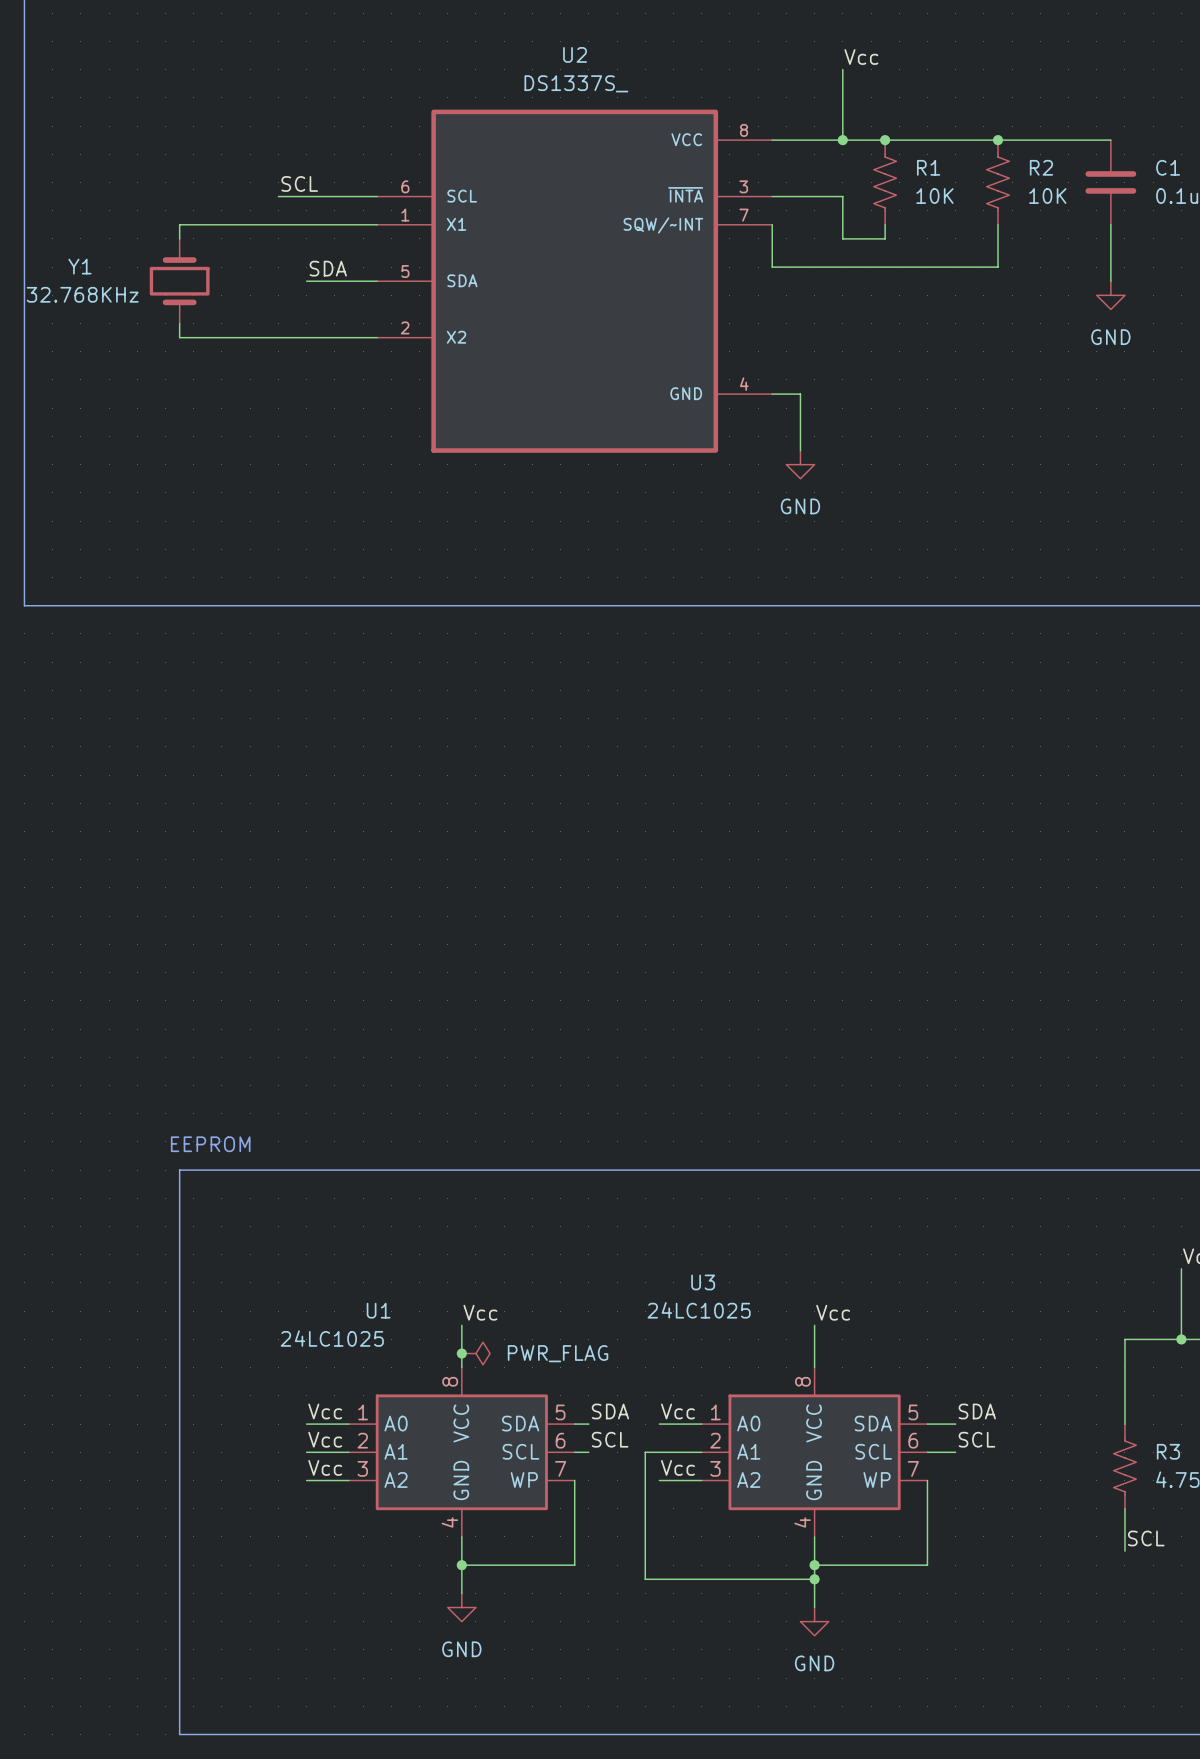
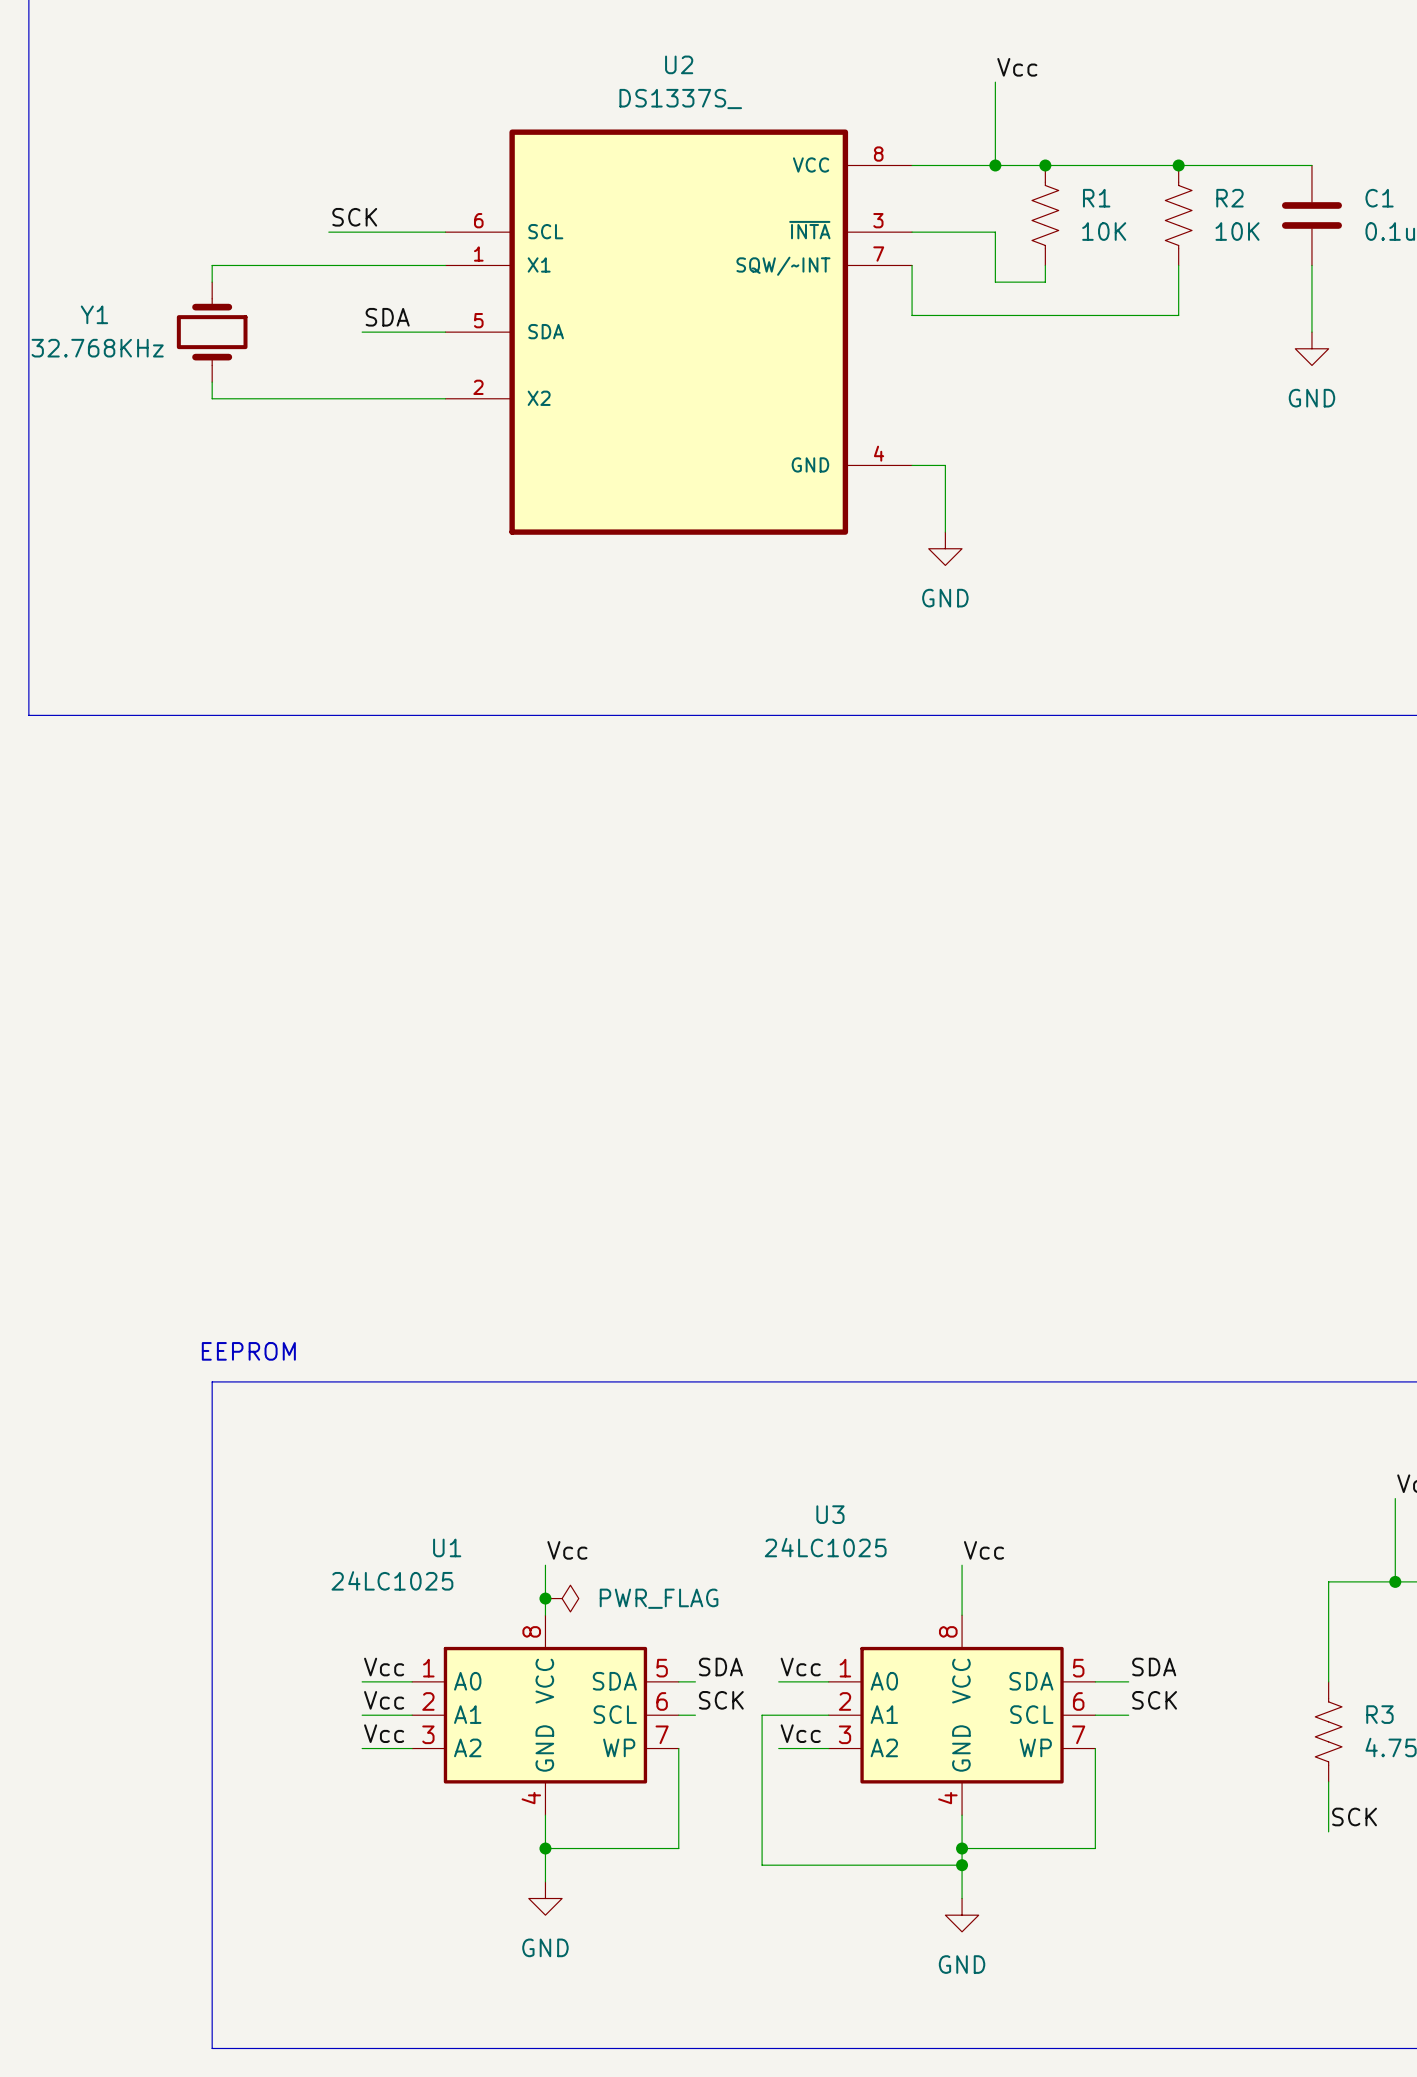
label: SCL (299, 183) -> SCK (354, 217)
label: SCL (610, 1439) -> SCK (721, 1700)
label: SCL (976, 1439) -> SCK (1154, 1700)
label: SCL (1146, 1538) -> SCK (1354, 1816)

